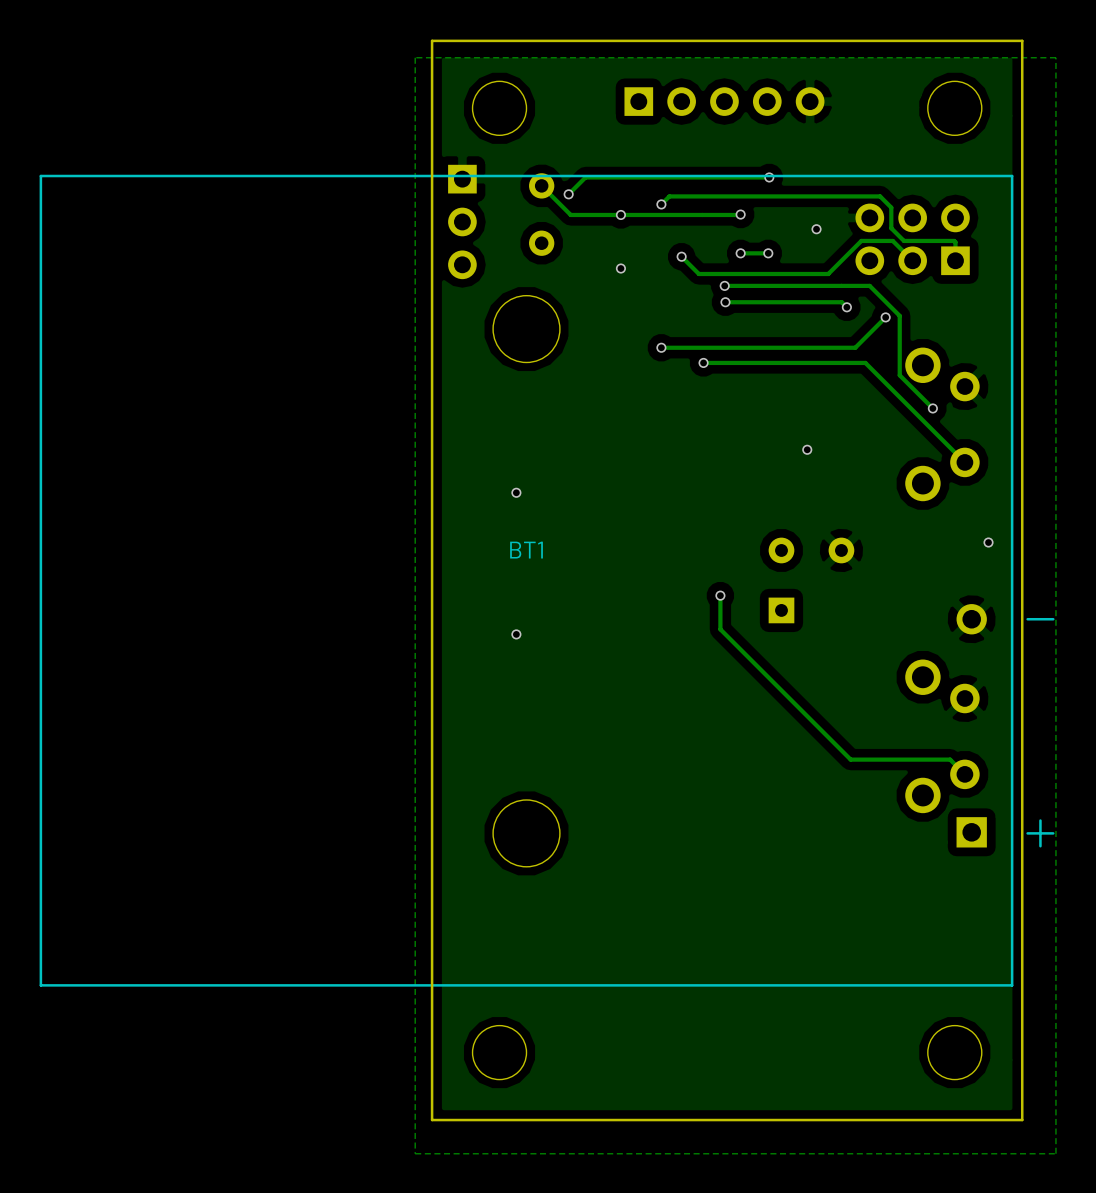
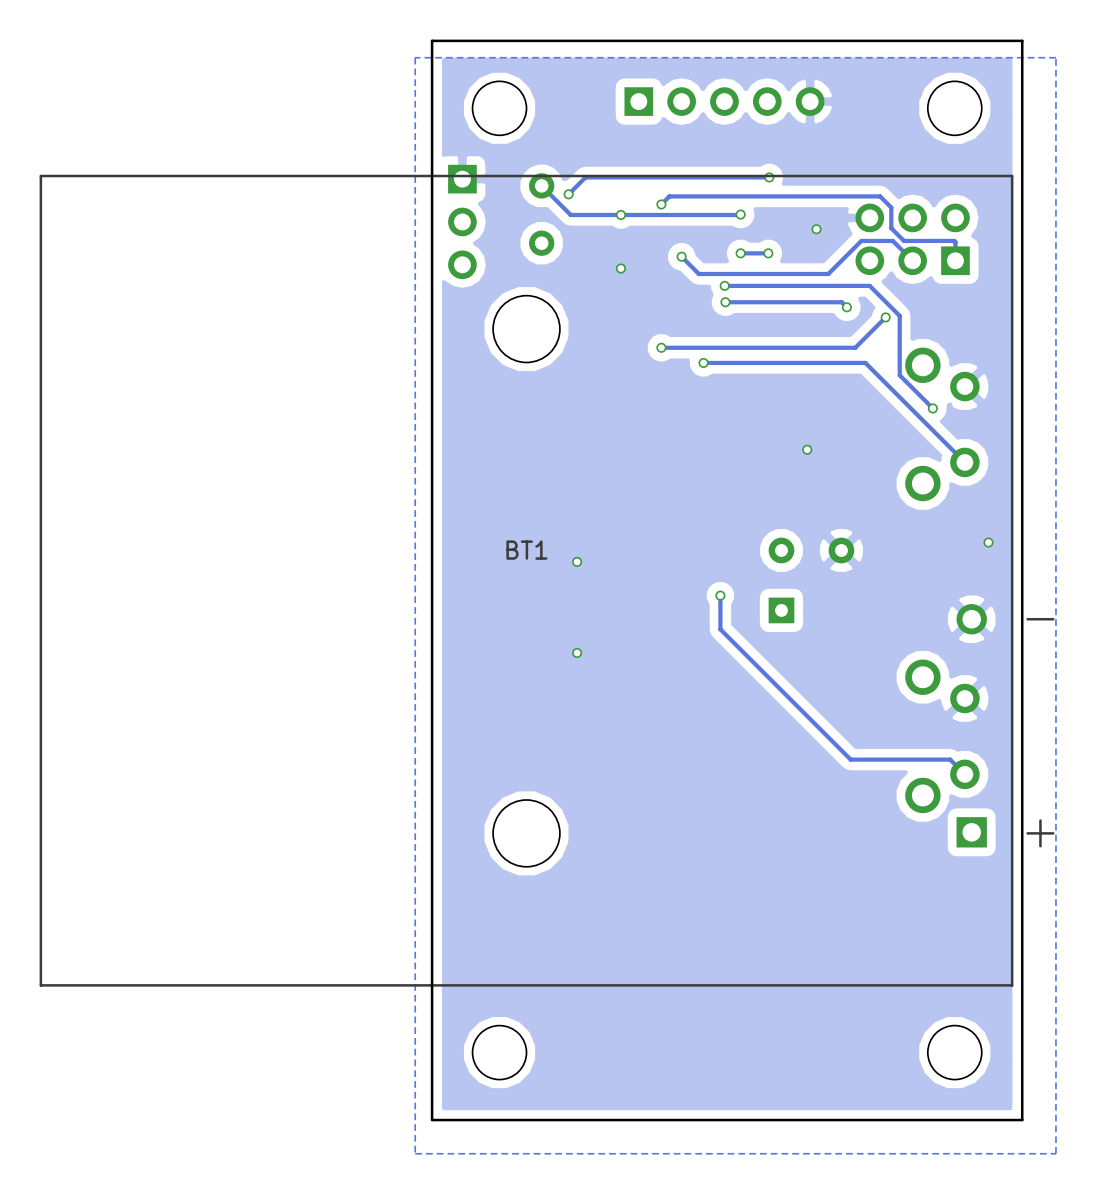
via: (516, 492) -> none
via: none -> (577, 561)
via: (516, 634) -> none
via: none -> (577, 652)

